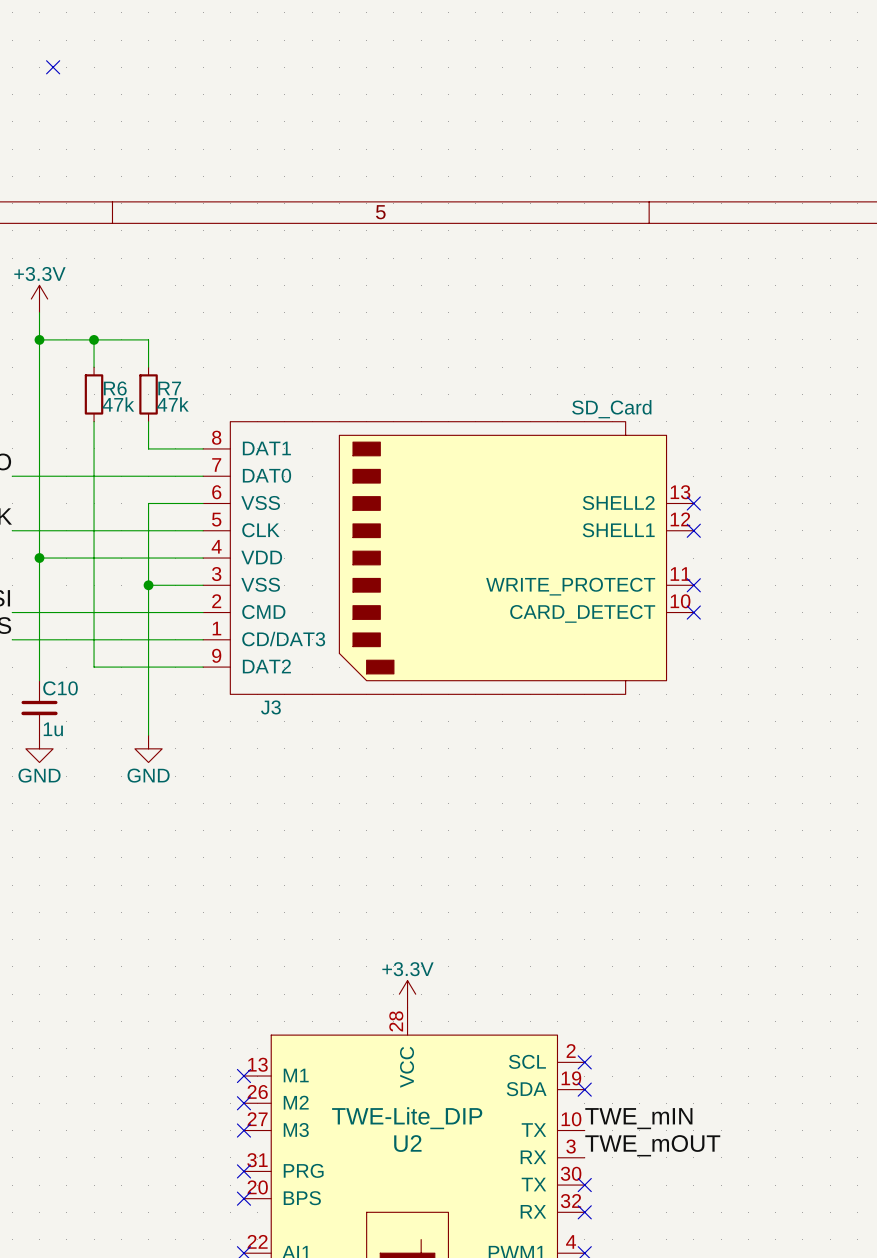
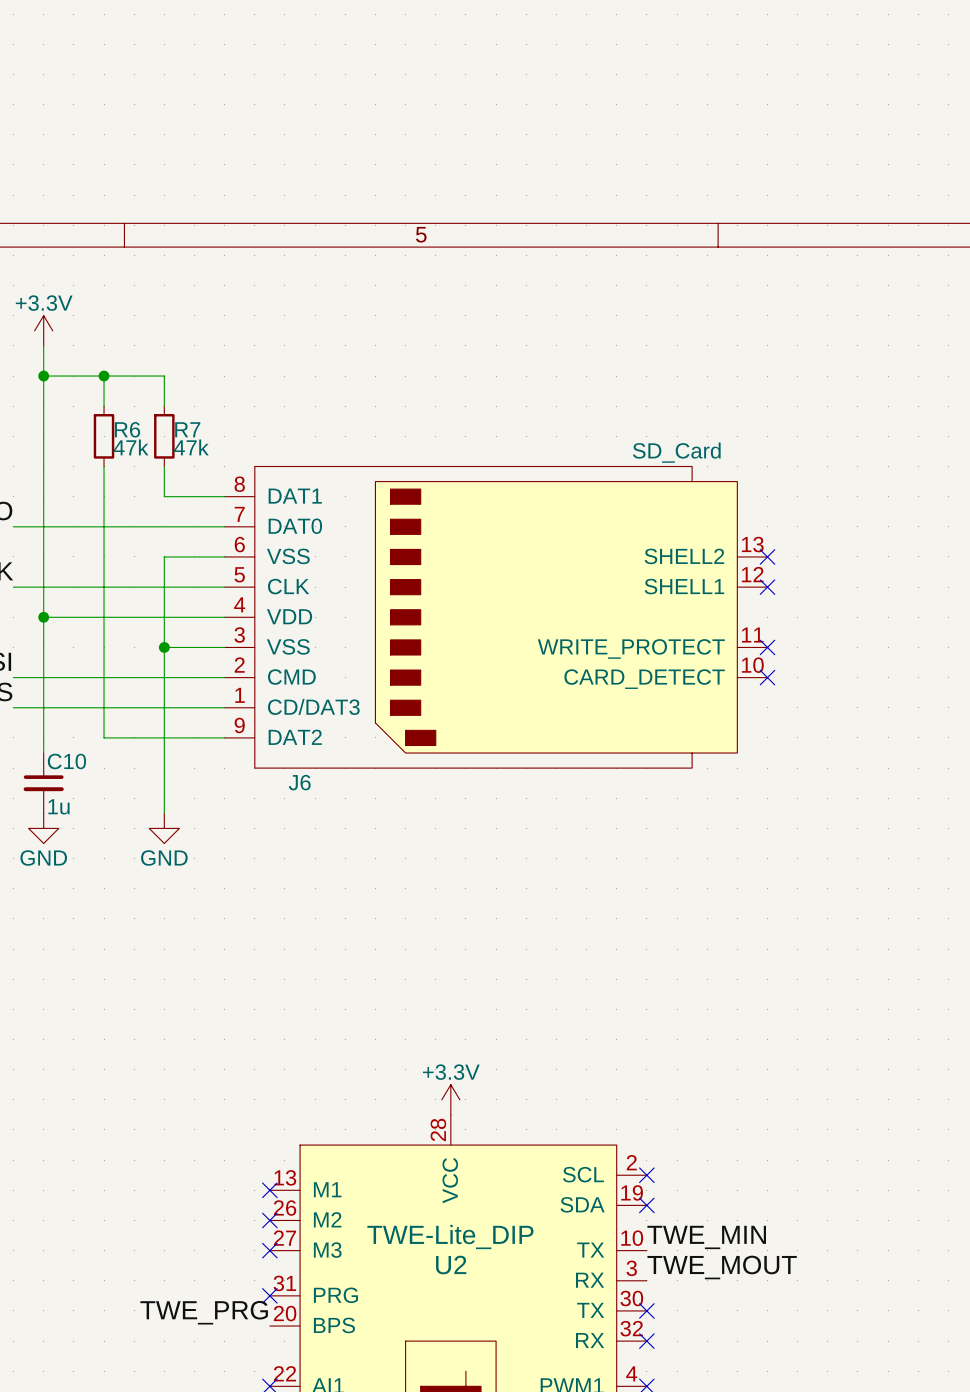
no-connect mark: (53, 67) -> none
J3 name: J3 (270, 707) -> J6 (299, 782)
label: TWE_mIN (638, 1118) -> TWE_MIN (706, 1237)
label: TWE_mOUT (652, 1145) -> TWE_MOUT (722, 1267)
label: none -> TWE_PRG (204, 1312)
no-connect mark: (243, 1198) -> none

